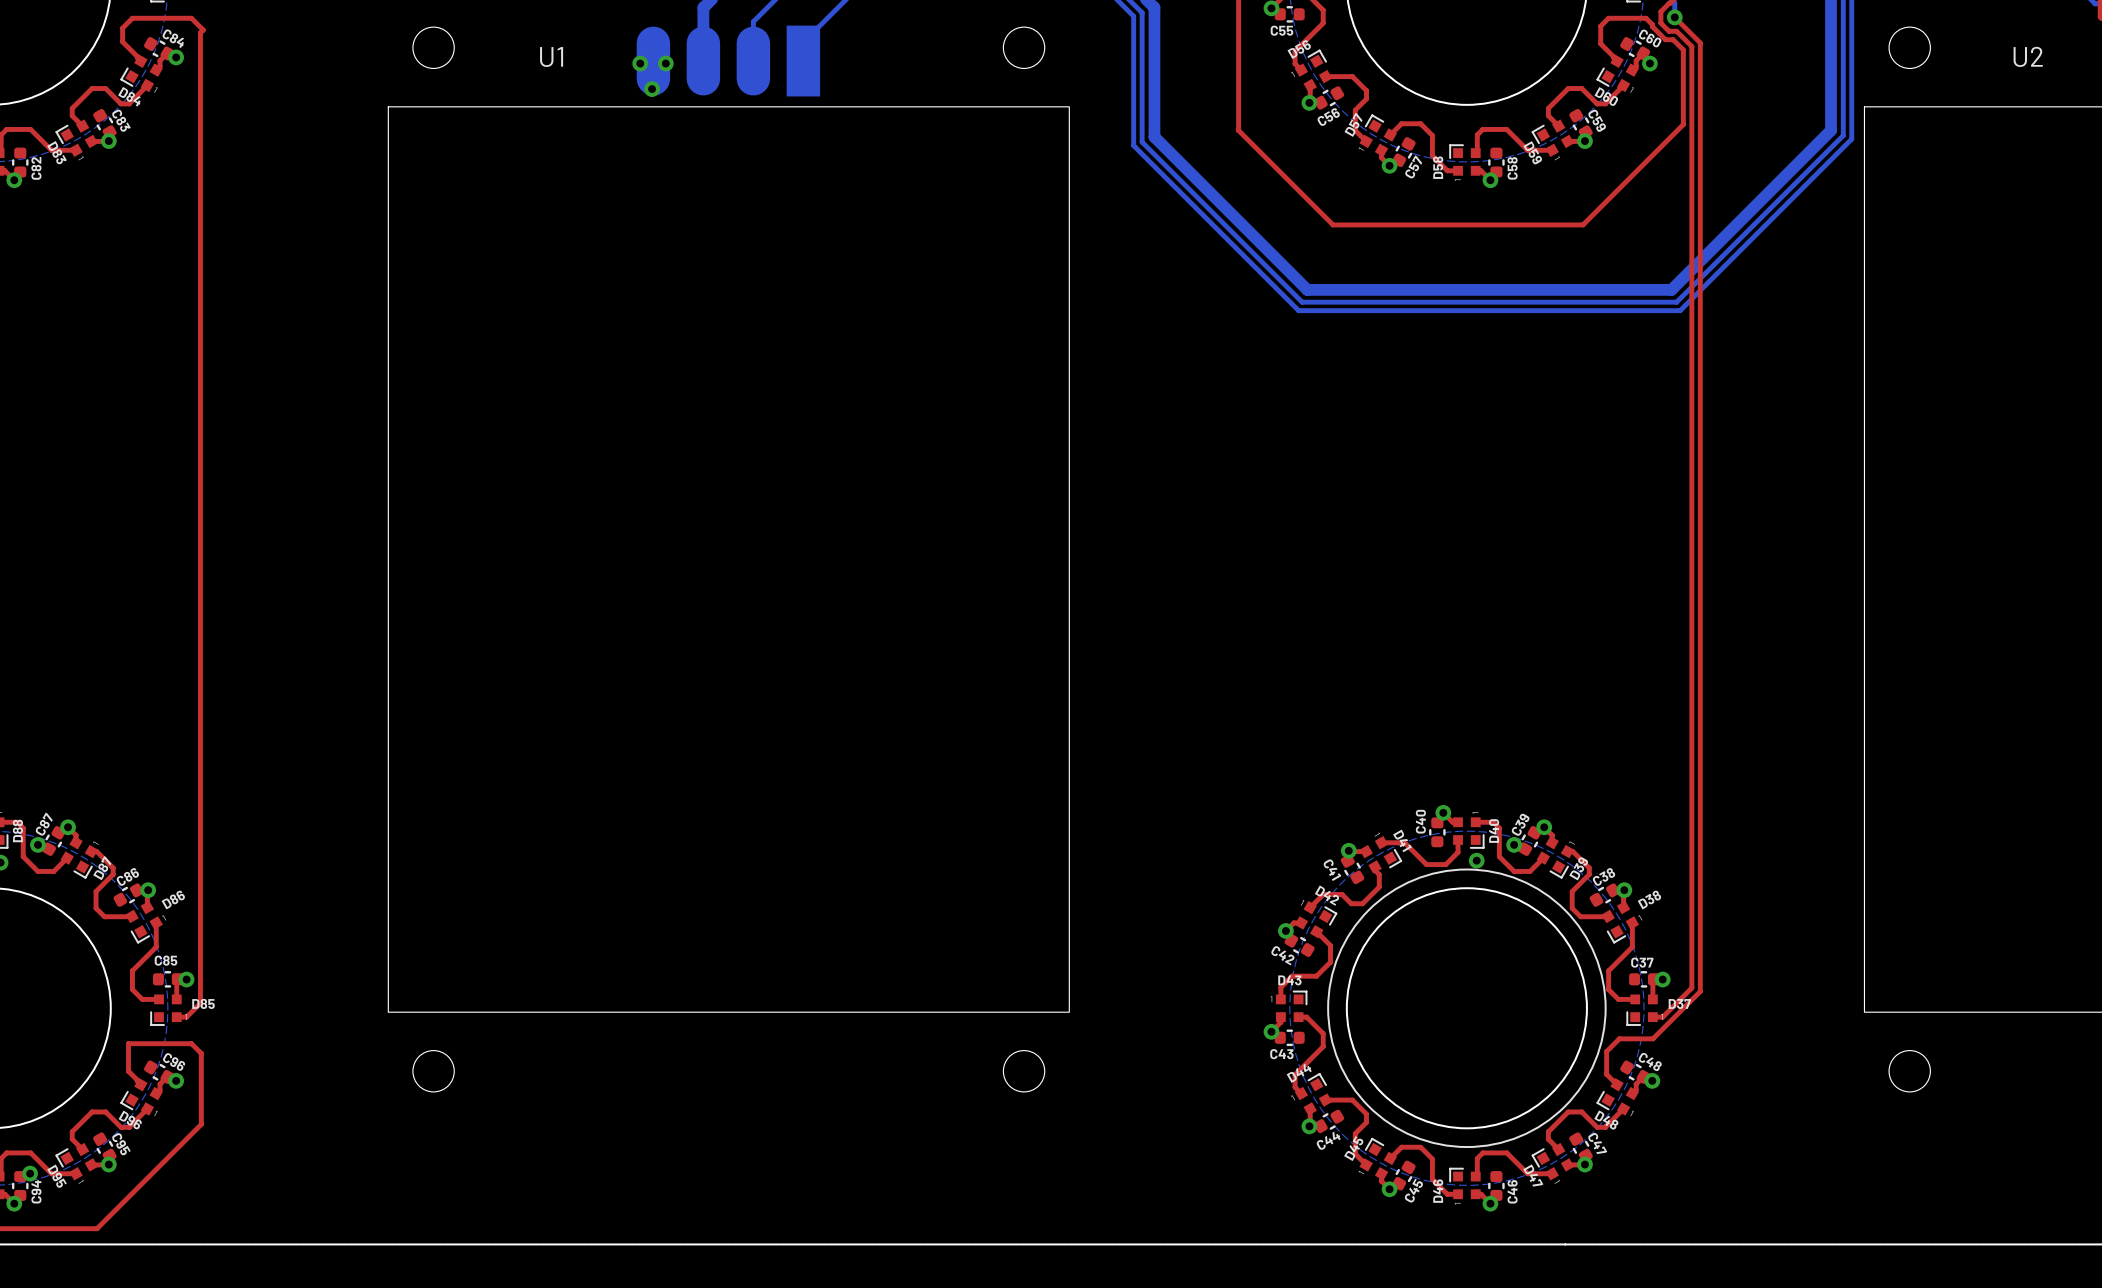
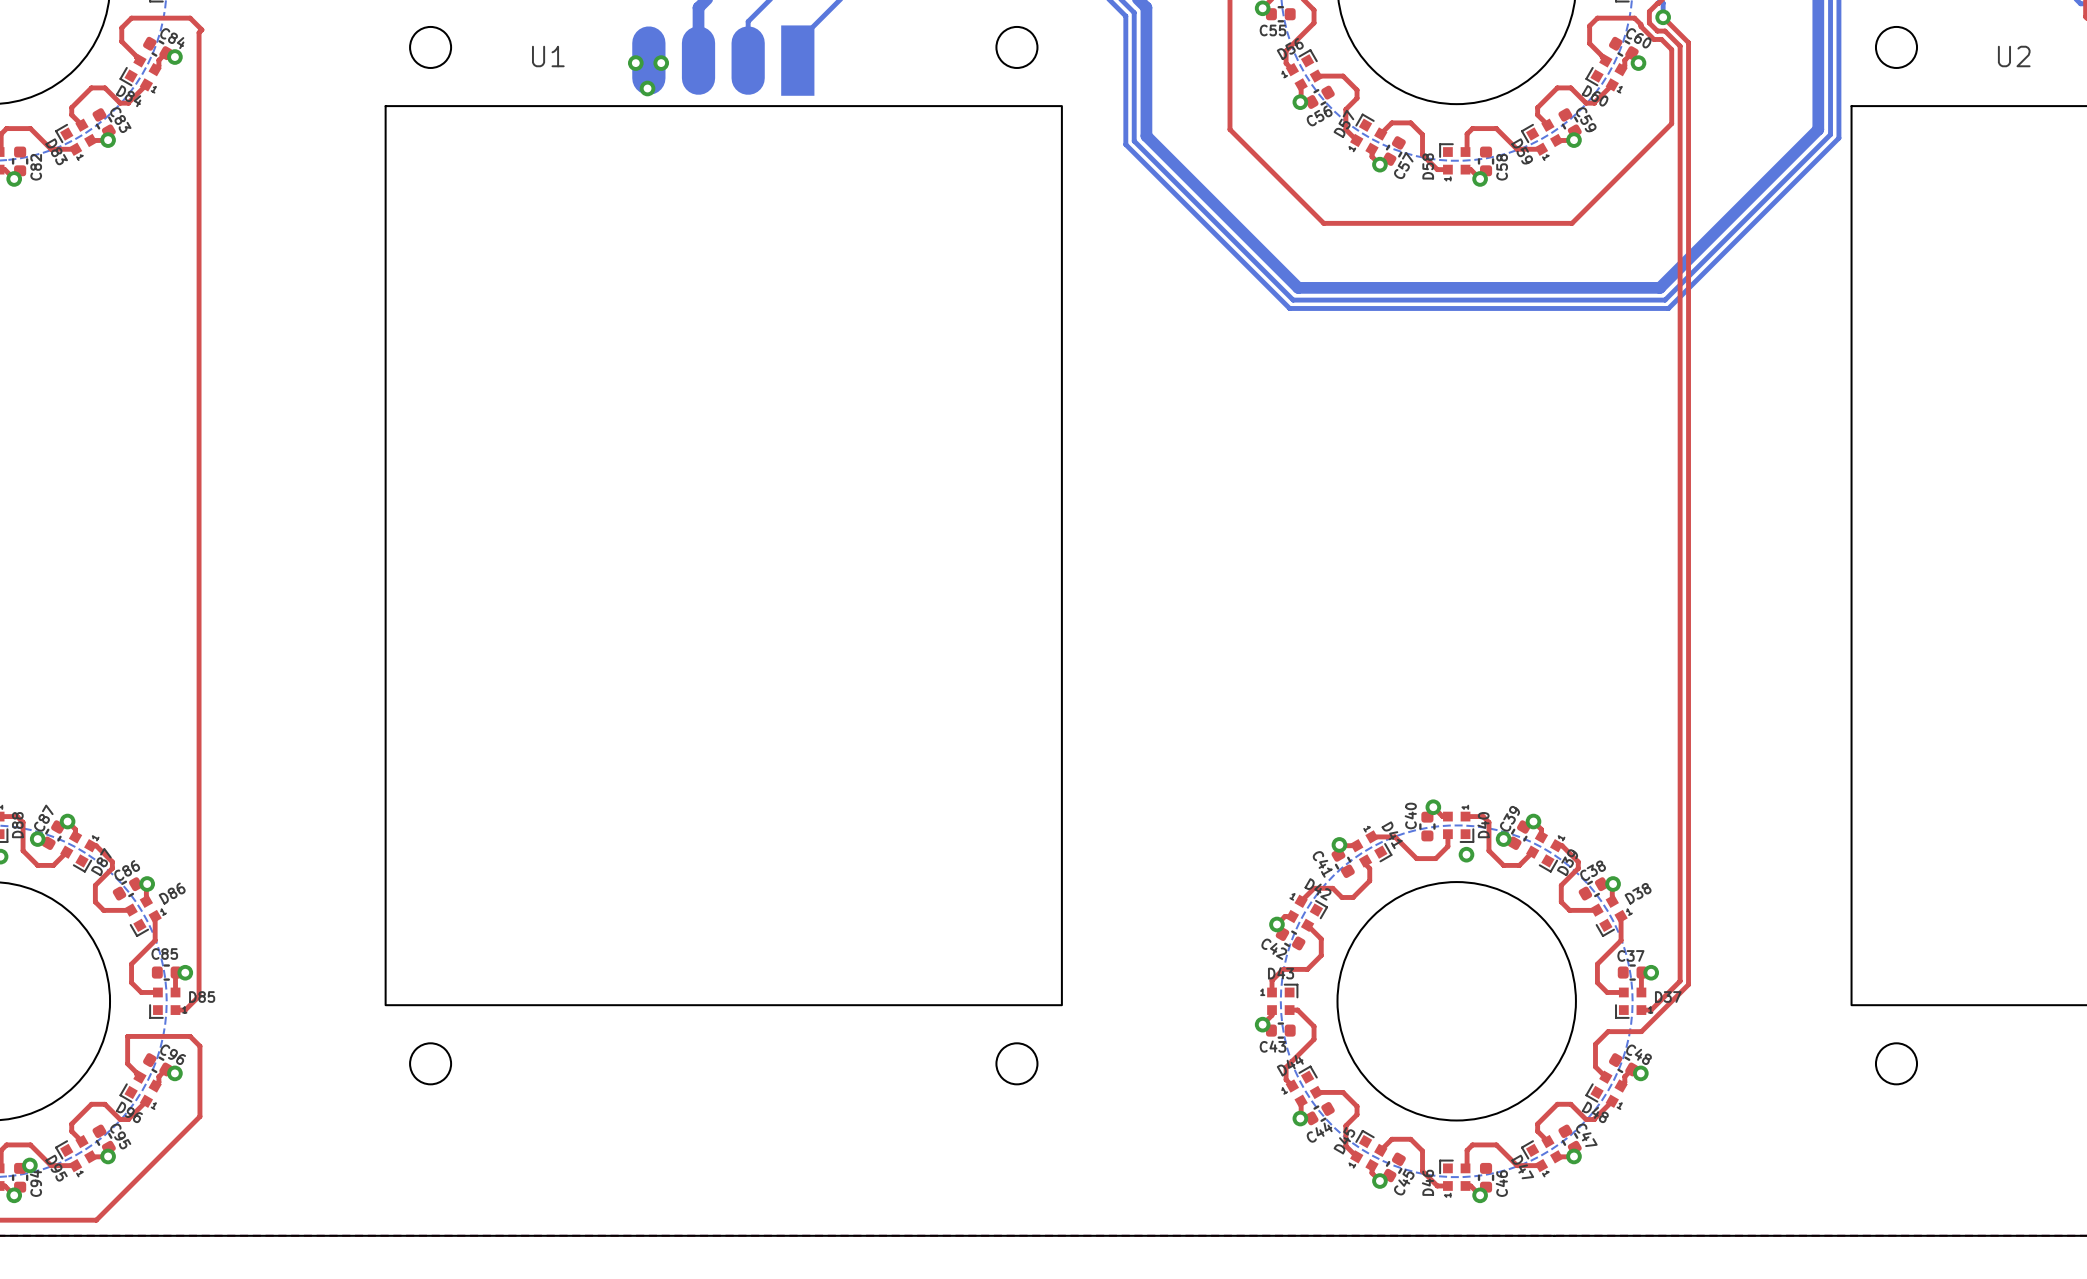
drawing: [1327, 868, 1607, 1149] -> none

